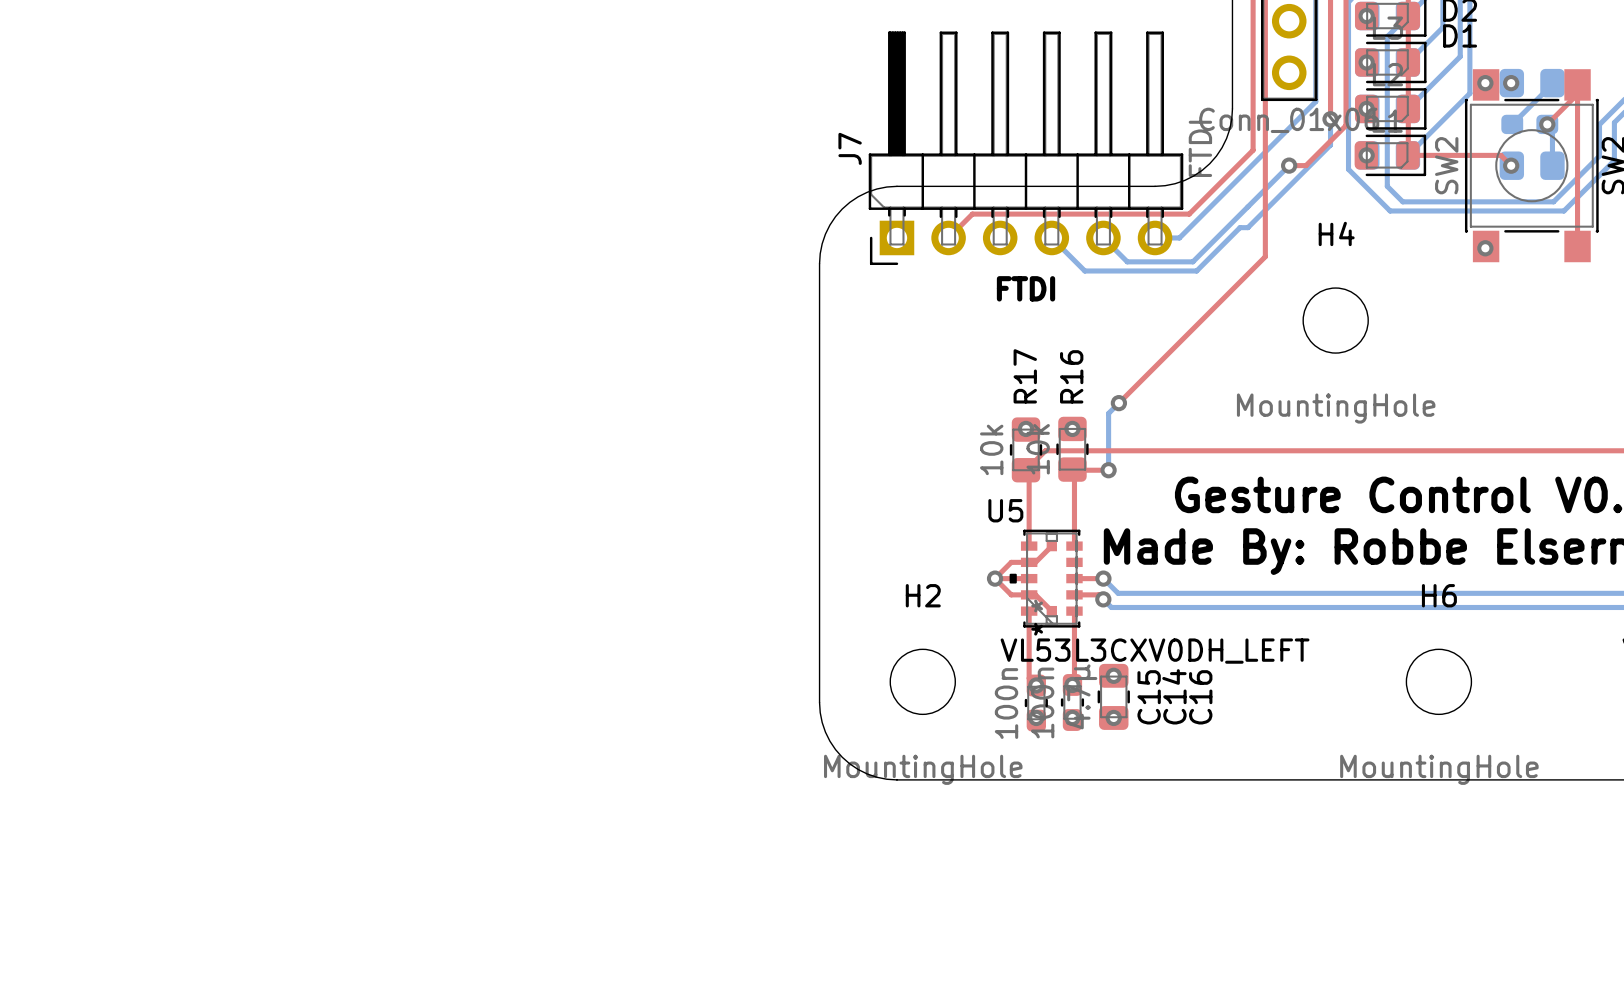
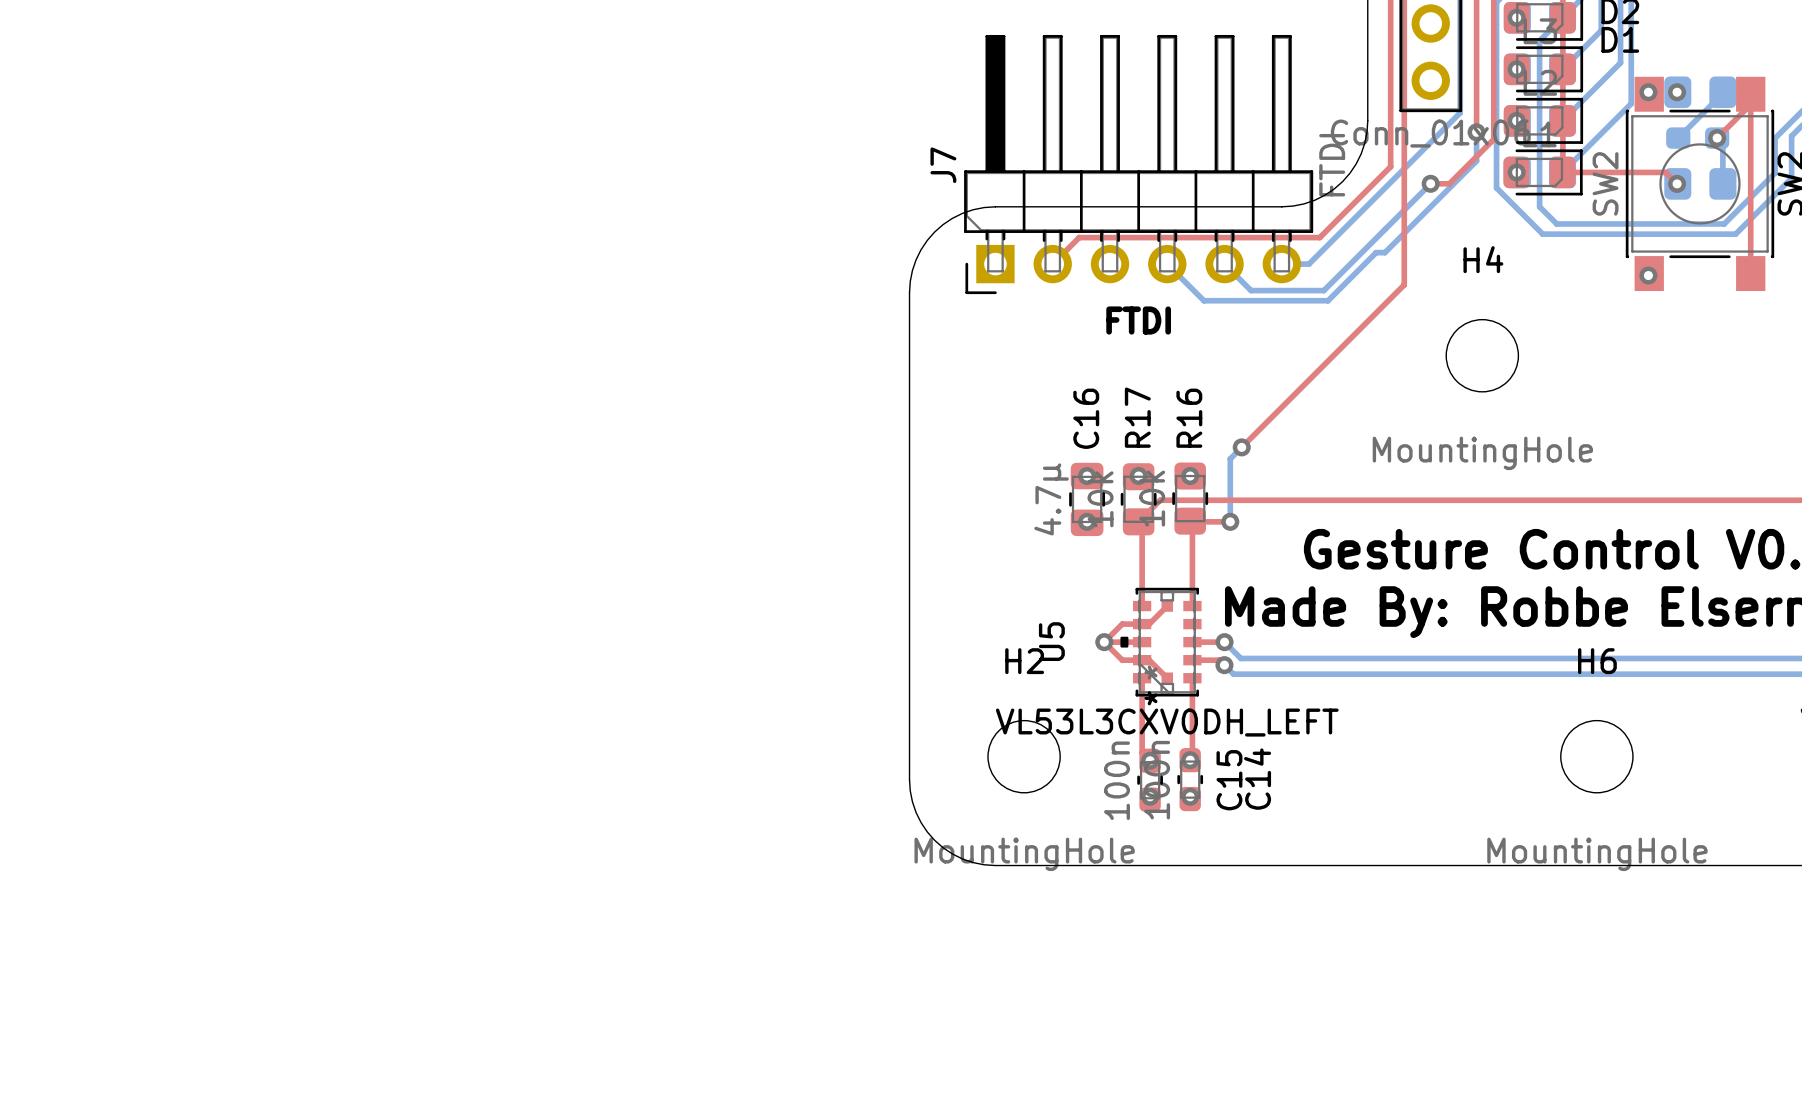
via: none -> (1087, 476)
via: none -> (1087, 521)
U5 name rotation: 0° (1005, 510) -> 90° counterclockwise (1051, 641)
U5 name position: U5 (1005, 510) -> U5 (1051, 641)
U5 value position: VL53L3CXV0DH_LEFT (1155, 651) -> VL53L3CXV0DH_LEFT (1167, 722)
via: (1113, 675) -> none
C16 position: (1113, 696) -> (1087, 499)
C14 name position: C14 (1174, 696) -> C14 (1257, 779)
C15 name position: C15 (1149, 697) -> C15 (1229, 780)
C16 name position: C16 (1200, 697) -> C16 (1086, 418)
via: (1113, 717) -> none

